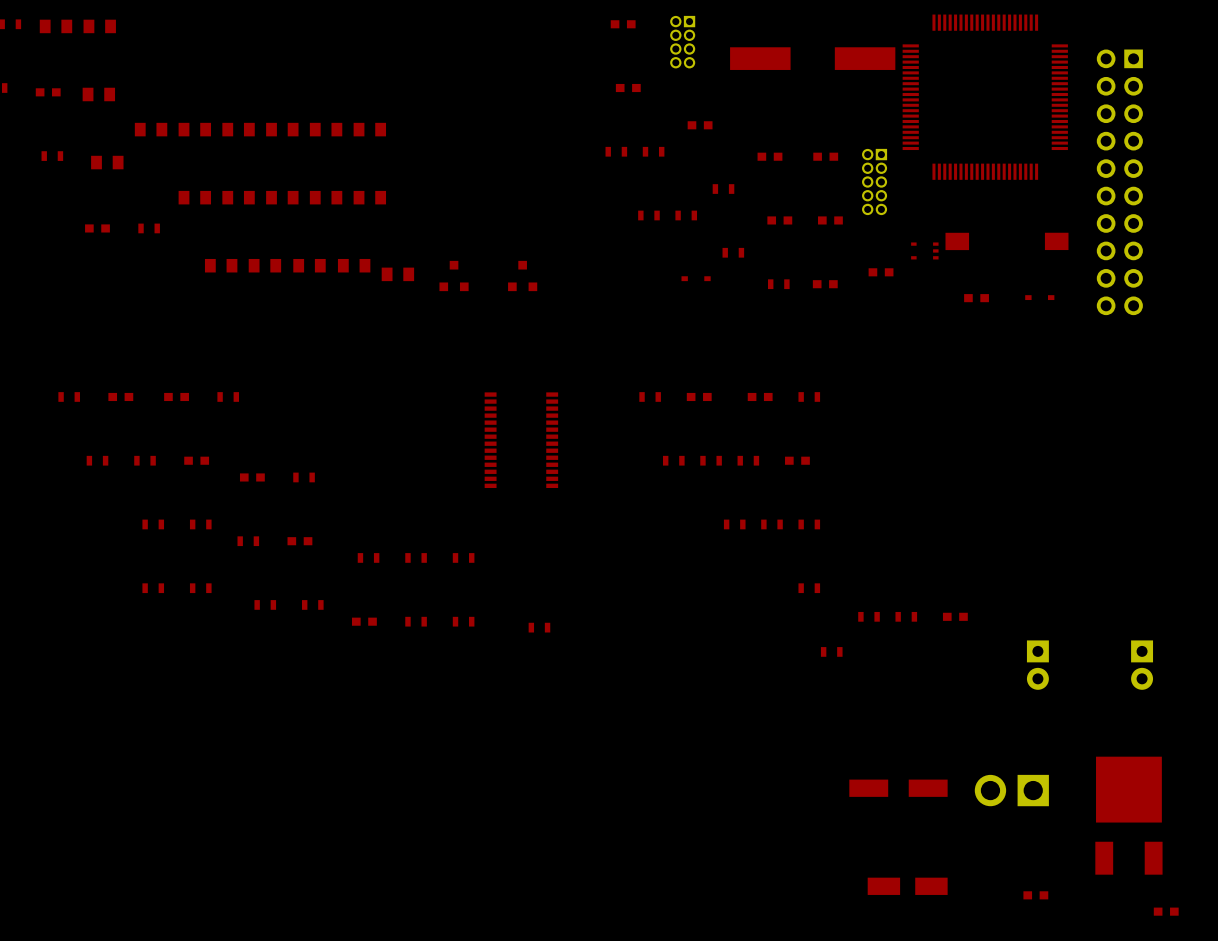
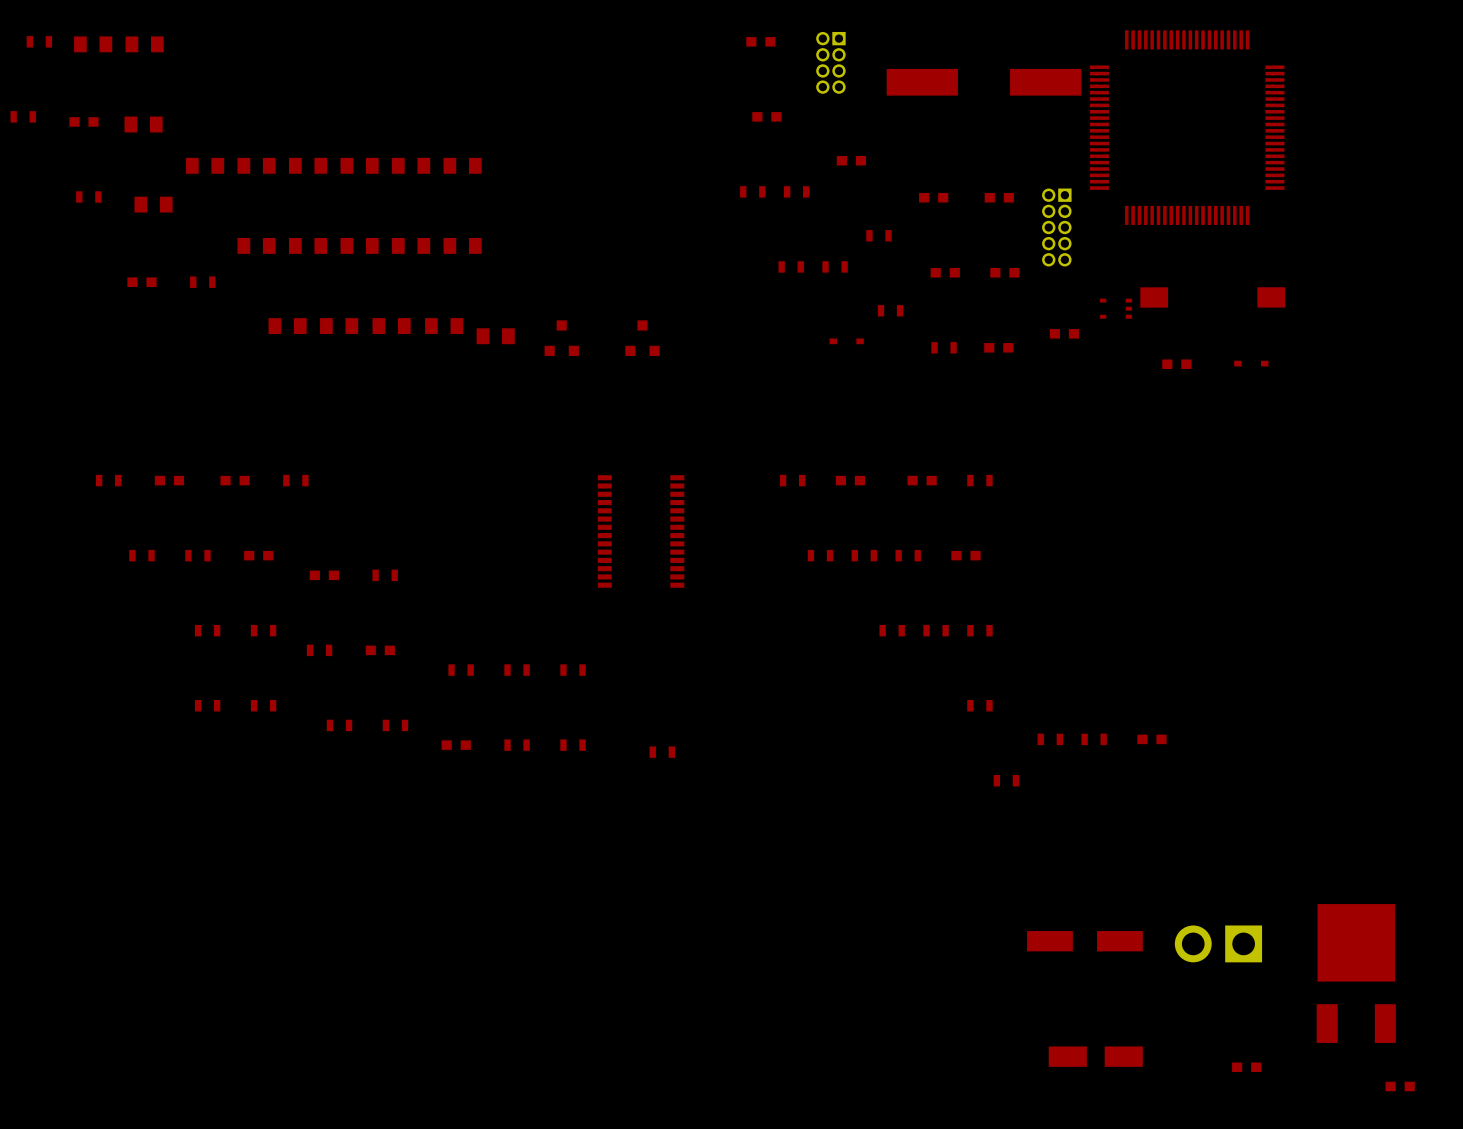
part: (1119, 182) -> none
part: (1037, 665) -> none
part: (1142, 665) -> none

